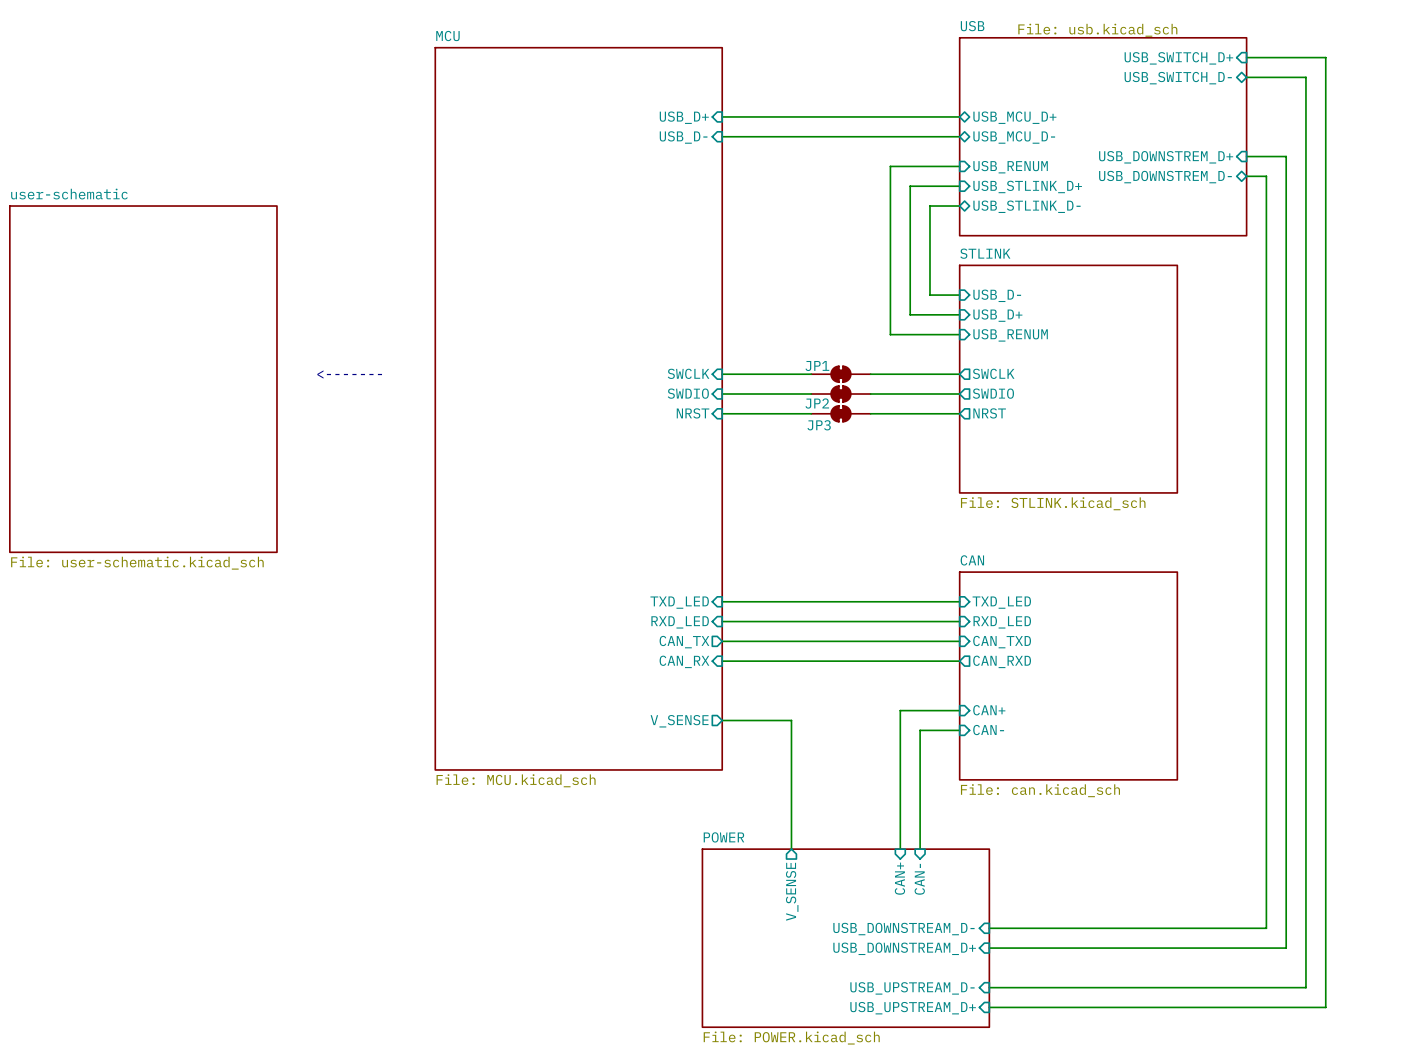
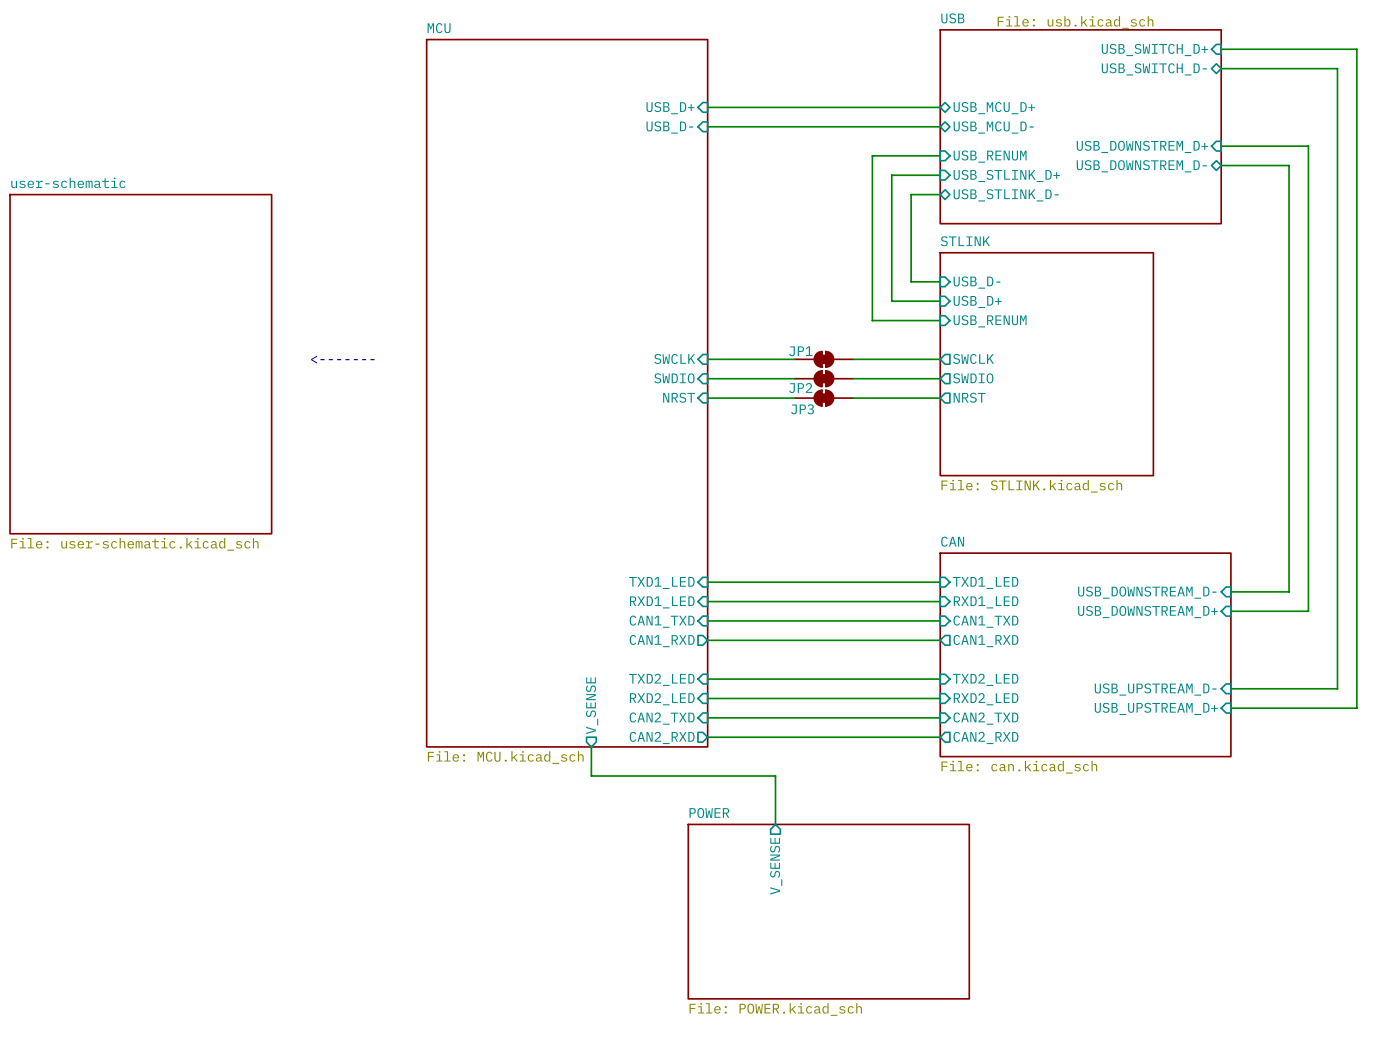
wire: (1325, 57) (1325, 1007) (989, 1007) -> (1298, 49) (1356, 49) (1356, 708) (1230, 708)
wire: (1305, 77) (1305, 987) (989, 987) -> (1279, 68) (1337, 68) (1337, 688) (1230, 688)
wire: (1286, 156) (1286, 948) (989, 948) -> (1259, 146) (1308, 146) (1308, 611) (1230, 611)
wire: (1266, 176) (1266, 928) (989, 928) -> (1240, 165) (1289, 165) (1289, 591) (1230, 591)
sheet pin: TXD_LED (679, 602) -> TXD1_LED (661, 583)
sheet pin: TXD_LED (1001, 602) -> TXD1_LED (985, 583)
sheet pin: none -> USB_DOWNSTREAM_D- (1147, 592)
sheet pin: RXD_LED (680, 622) -> RXD1_LED (662, 602)
sheet pin: RXD_LED (1002, 622) -> RXD1_LED (986, 602)
sheet pin: none -> USB_DOWNSTREAM_D+ (1147, 612)
sheet pin shape: output (684, 642) -> input (662, 621)
sheet pin: CAN_TX (684, 642) -> CAN1_TXD (662, 621)
sheet pin: CAN_TXD (1002, 642) -> CAN1_TXD (985, 621)
sheet pin shape: input (684, 661) -> output (662, 641)
sheet pin: CAN_RX (684, 661) -> CAN1_RXD (662, 641)
sheet pin: CAN_RXD (1002, 661) -> CAN1_RXD (985, 641)
sheet CAN: File: can.kicad_sch (1068, 675) -> none
sheet CAN: none -> File: can.kicad_sch (1085, 654)
wire: none -> (707, 679) (940, 679)
sheet pin: none -> TXD2_LED (661, 679)
sheet pin: none -> TXD2_LED (985, 679)
wire: (959, 710) (900, 710) (900, 849) -> none
sheet pin: CAN+ (989, 710) -> none
sheet pin: none -> USB_UPSTREAM_D- (1155, 689)
wire: (791, 720) (791, 799) -> (775, 698) (940, 698)
sheet pin shape: output (679, 721) -> input (662, 699)
sheet pin: V_SENSE (679, 721) -> RXD2_LED (662, 699)
sheet pin: none -> RXD2_LED (986, 699)
sheet pin: none -> V_SENSE (592, 705)
wire: (959, 730) (920, 730) (920, 849) -> none
sheet pin: CAN- (988, 730) -> none
sheet pin: none -> USB_UPSTREAM_D+ (1156, 708)
wire: none -> (707, 717) (940, 717)
sheet pin: none -> CAN2_TXD (662, 718)
sheet pin: none -> CAN2_TXD (985, 718)
sheet pin: none -> CAN2_RXD (662, 737)
wire: none -> (707, 737) (940, 737)
sheet pin: none -> CAN2_RXD (985, 737)
wire: none -> (591, 746) (591, 775) (775, 775)
sheet pin: CAN+ (899, 878) -> none
sheet pin: CAN- (919, 879) -> none
sheet pin: USB_DOWNSTREAM_D- (903, 929) -> none
sheet pin: USB_DOWNSTREAM_D+ (904, 948) -> none
sheet pin: USB_UPSTREAM_D- (912, 988) -> none
sheet pin: USB_UPSTREAM_D+ (913, 1008) -> none

